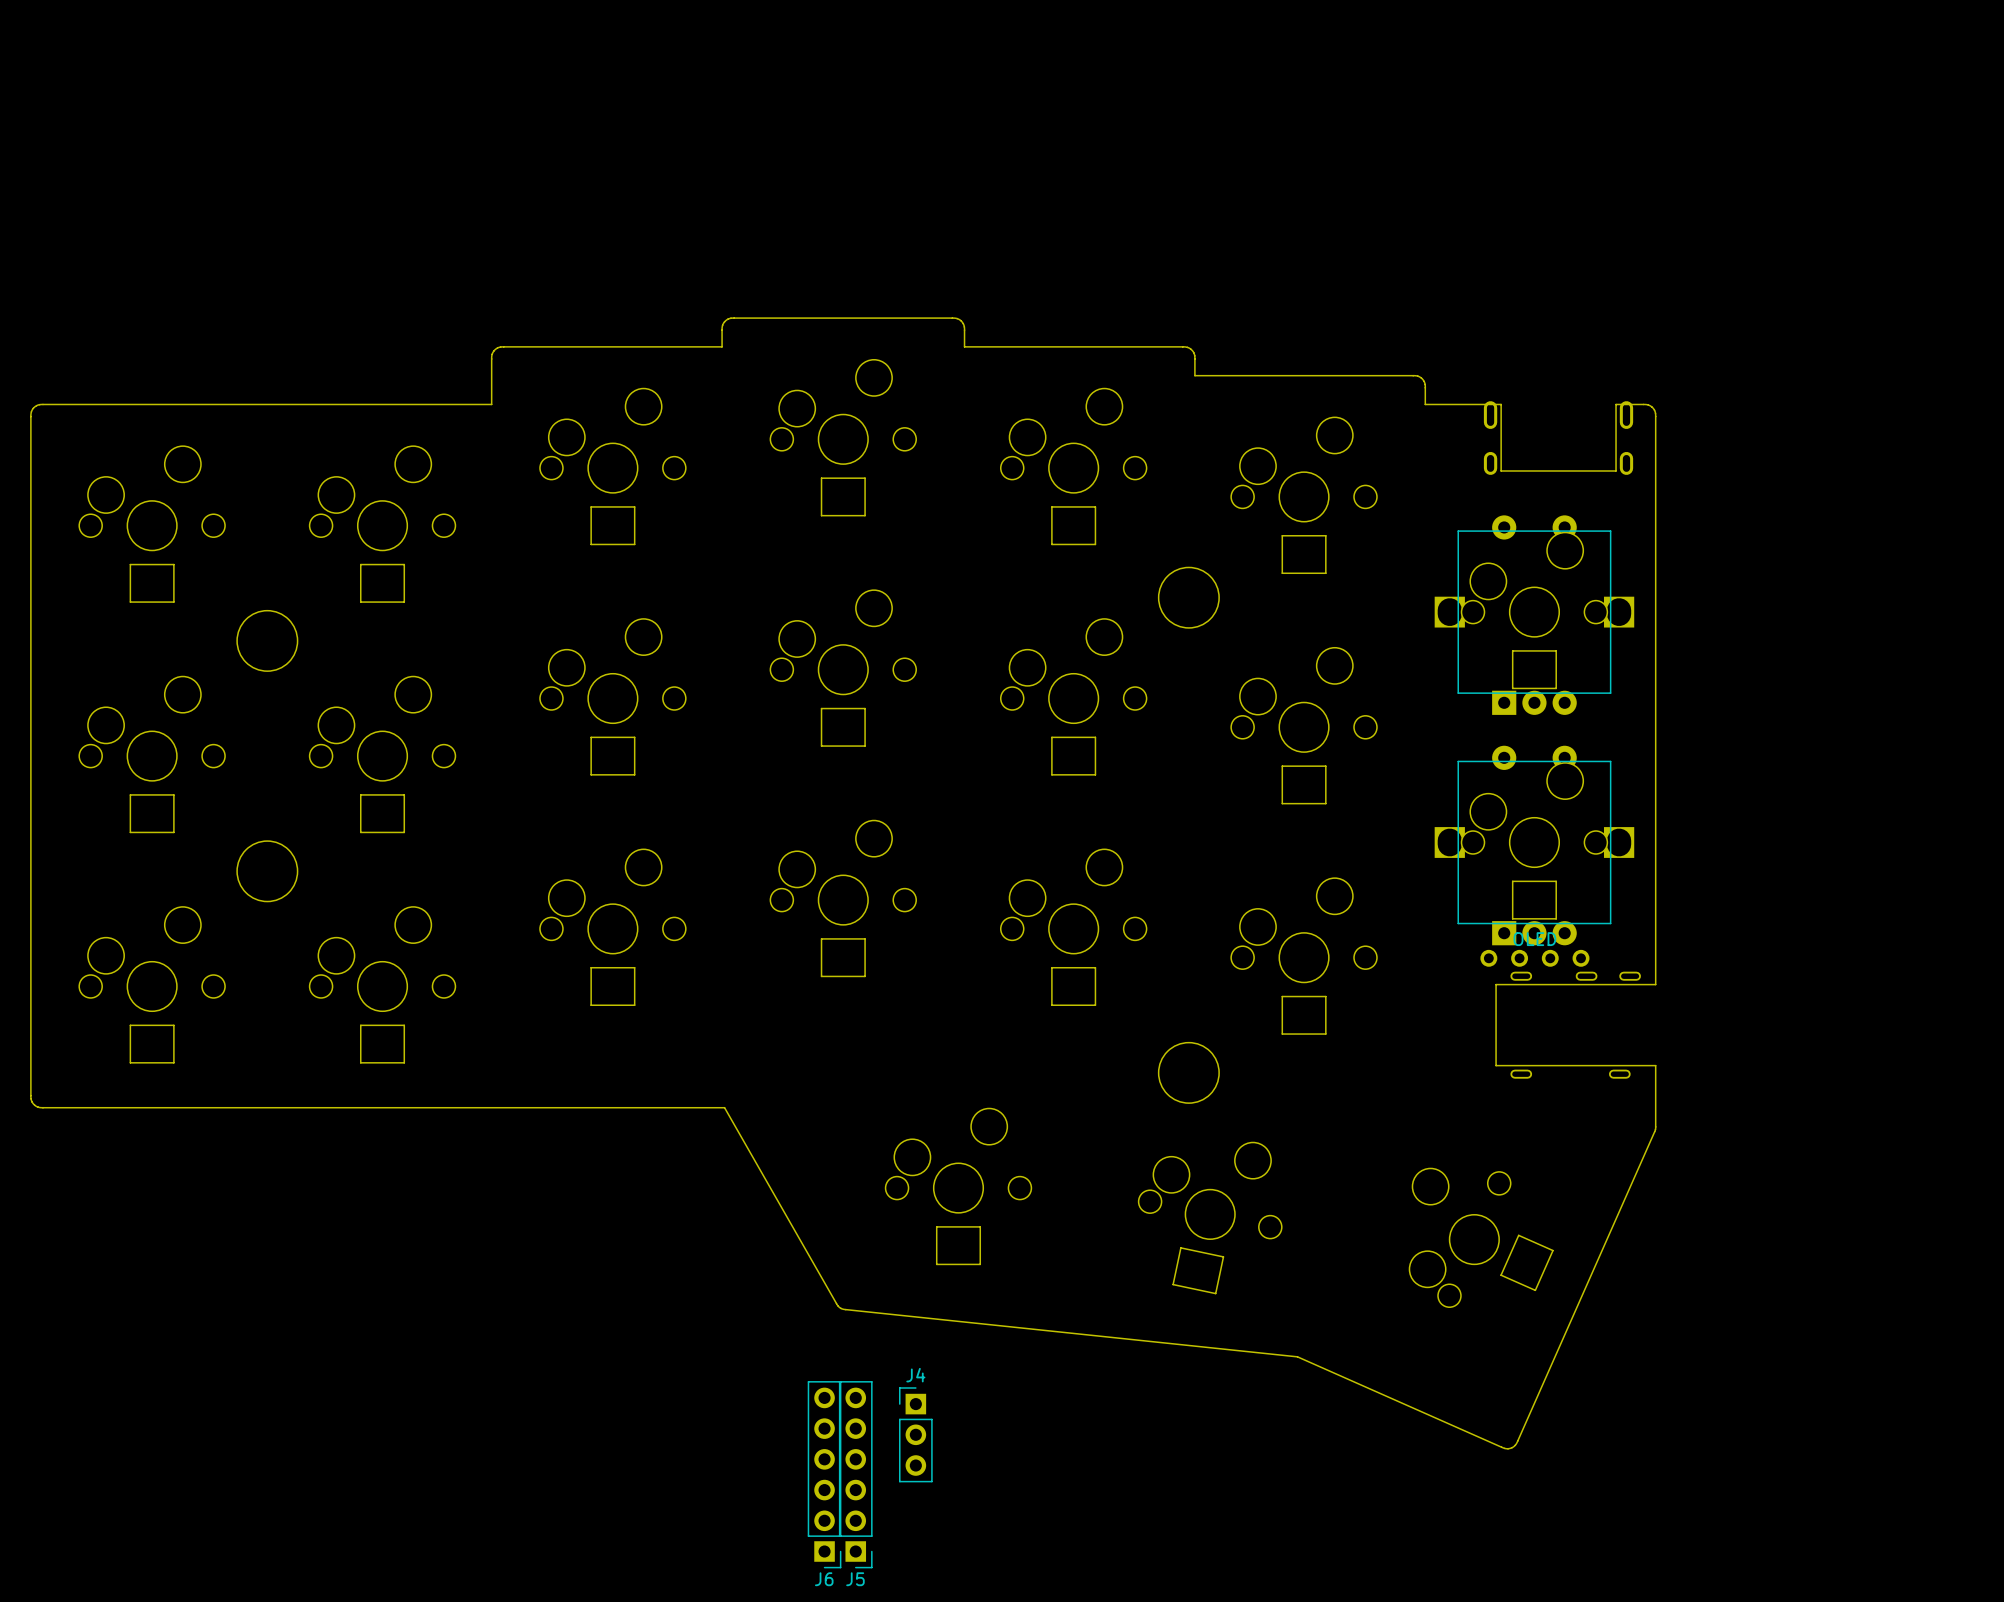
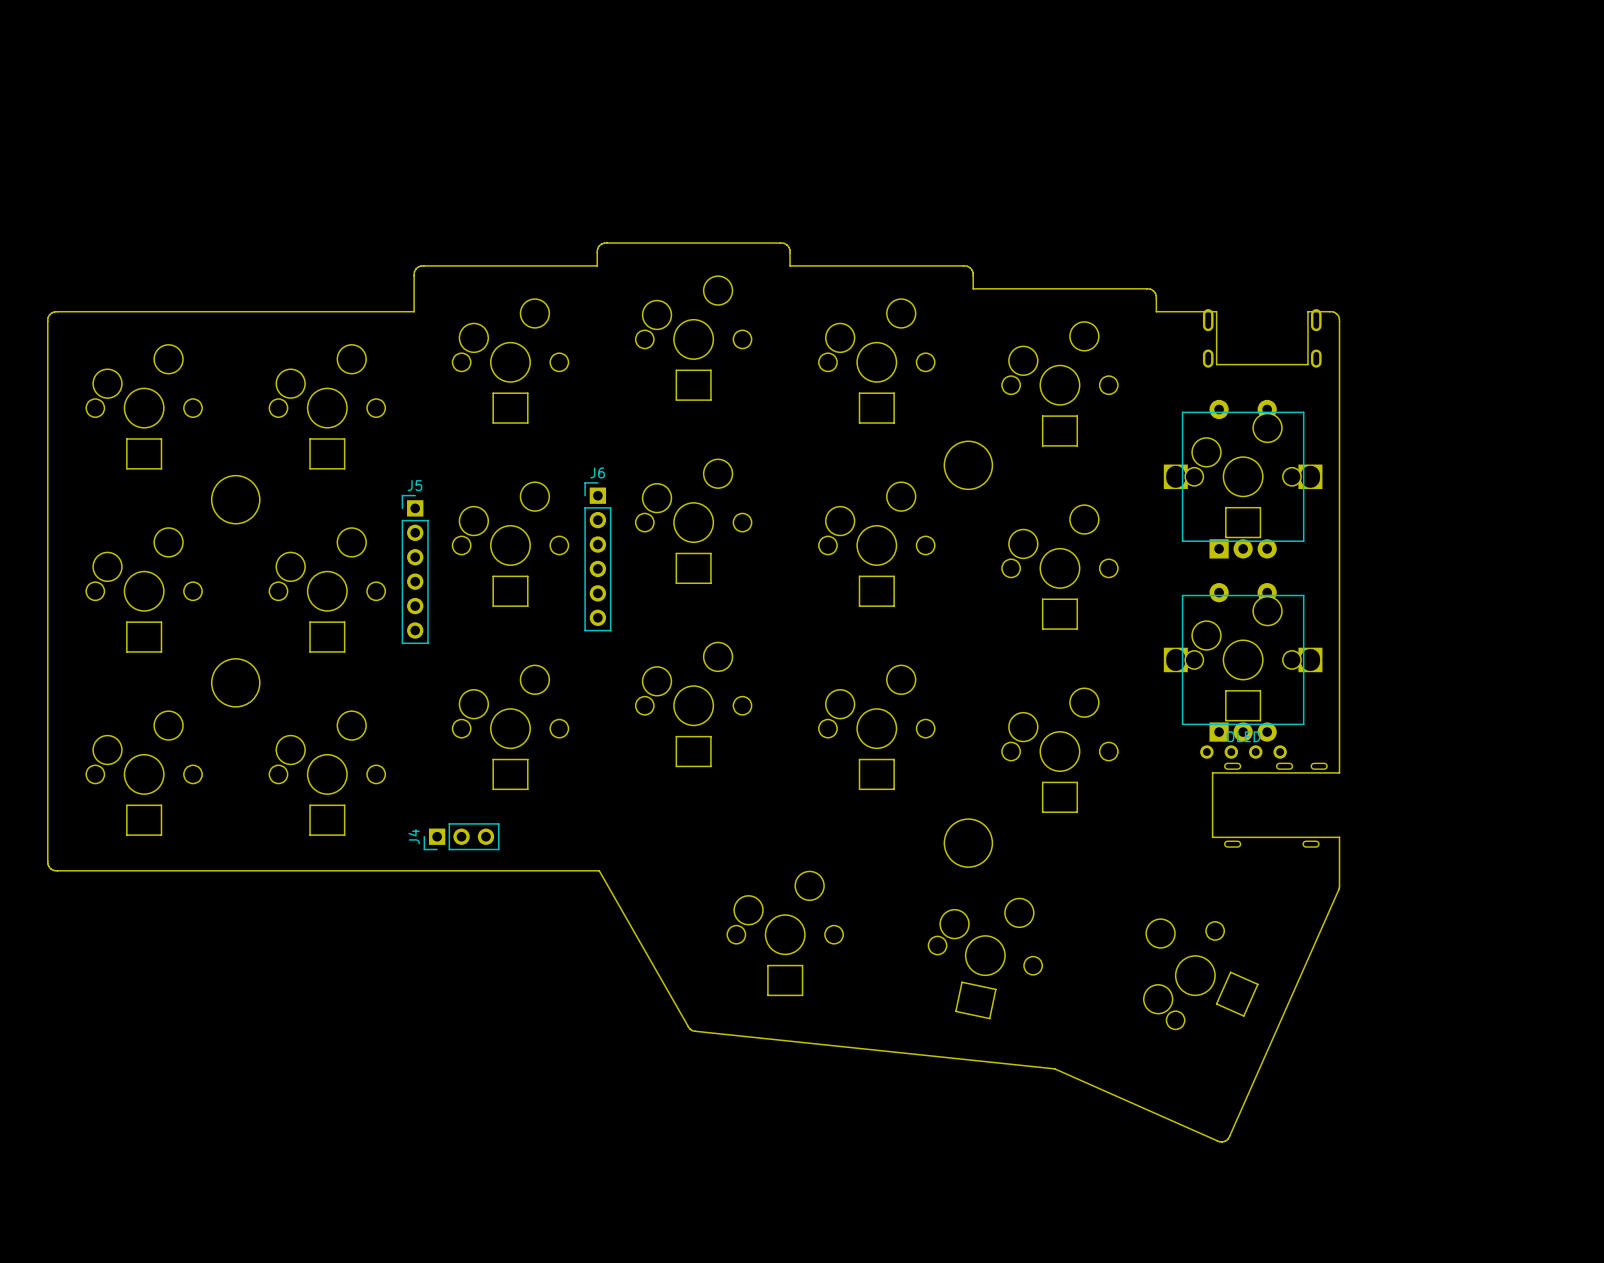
J4 rotation: 0° (915, 1434) -> 90° counterclockwise (461, 836)
J4 position: (915, 1434) -> (461, 836)
J6 rotation: 0° (824, 1474) -> 180° (597, 556)
J6 position: (824, 1474) -> (597, 556)
J5 rotation: 0° (855, 1474) -> 180° (415, 569)
J5 position: (855, 1474) -> (415, 569)

